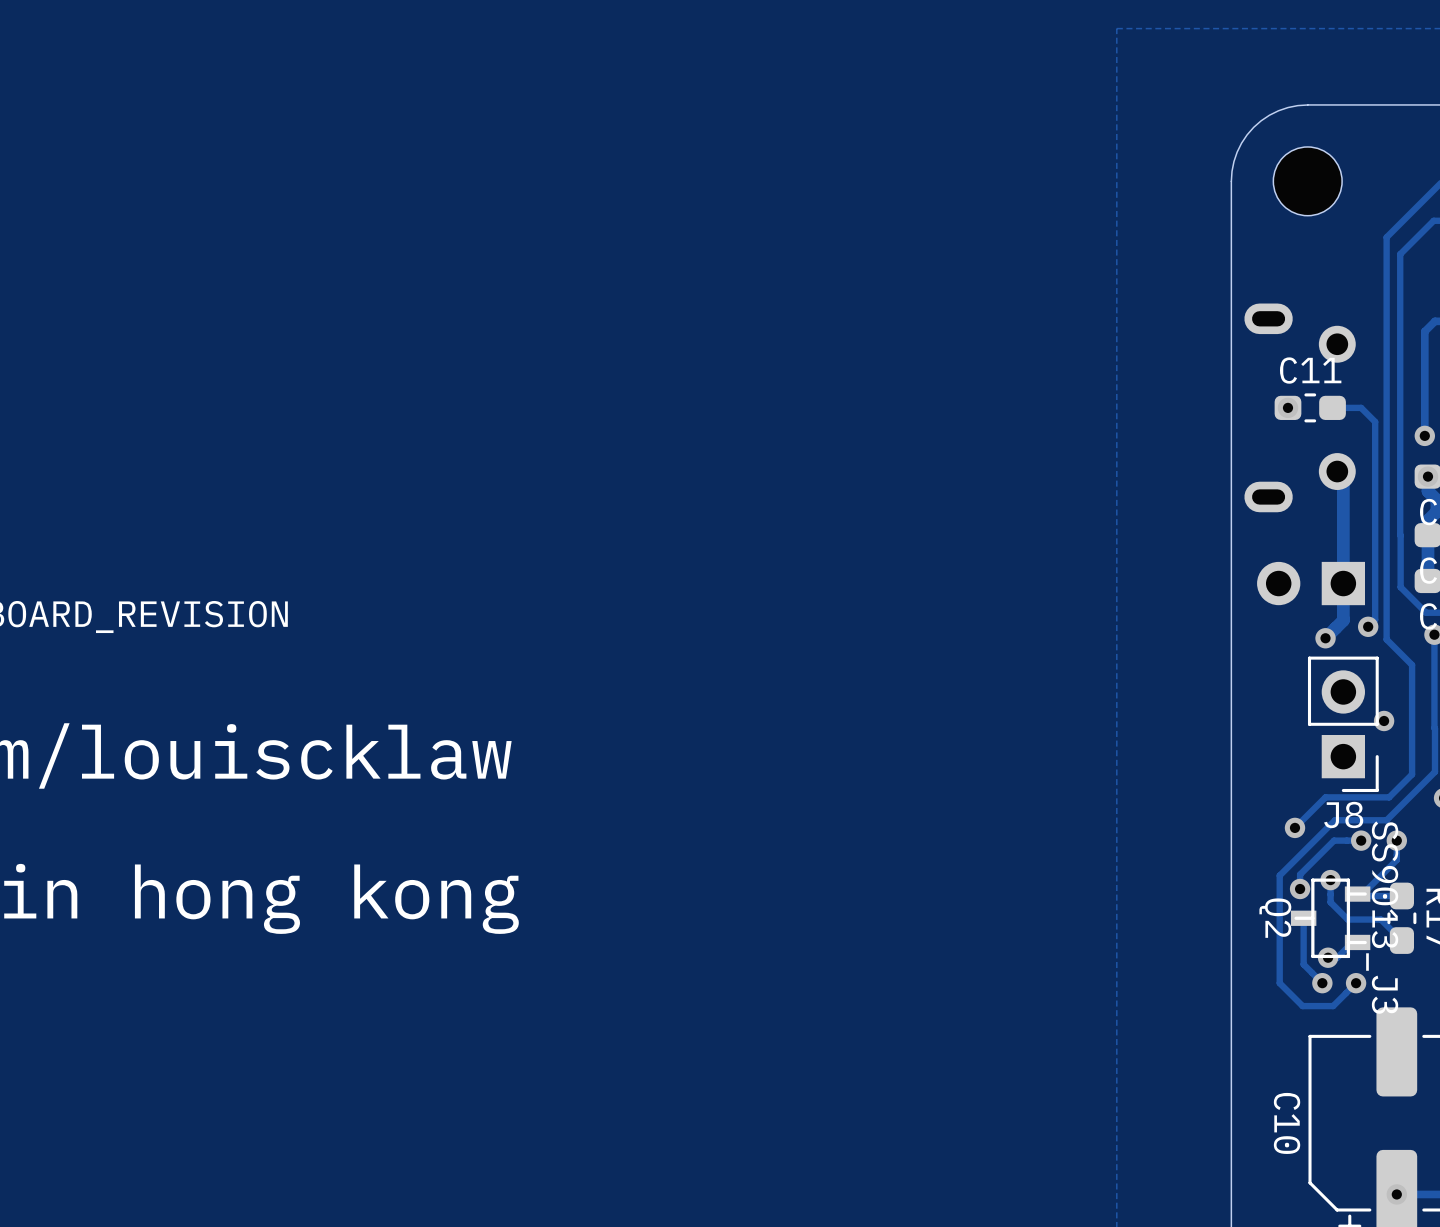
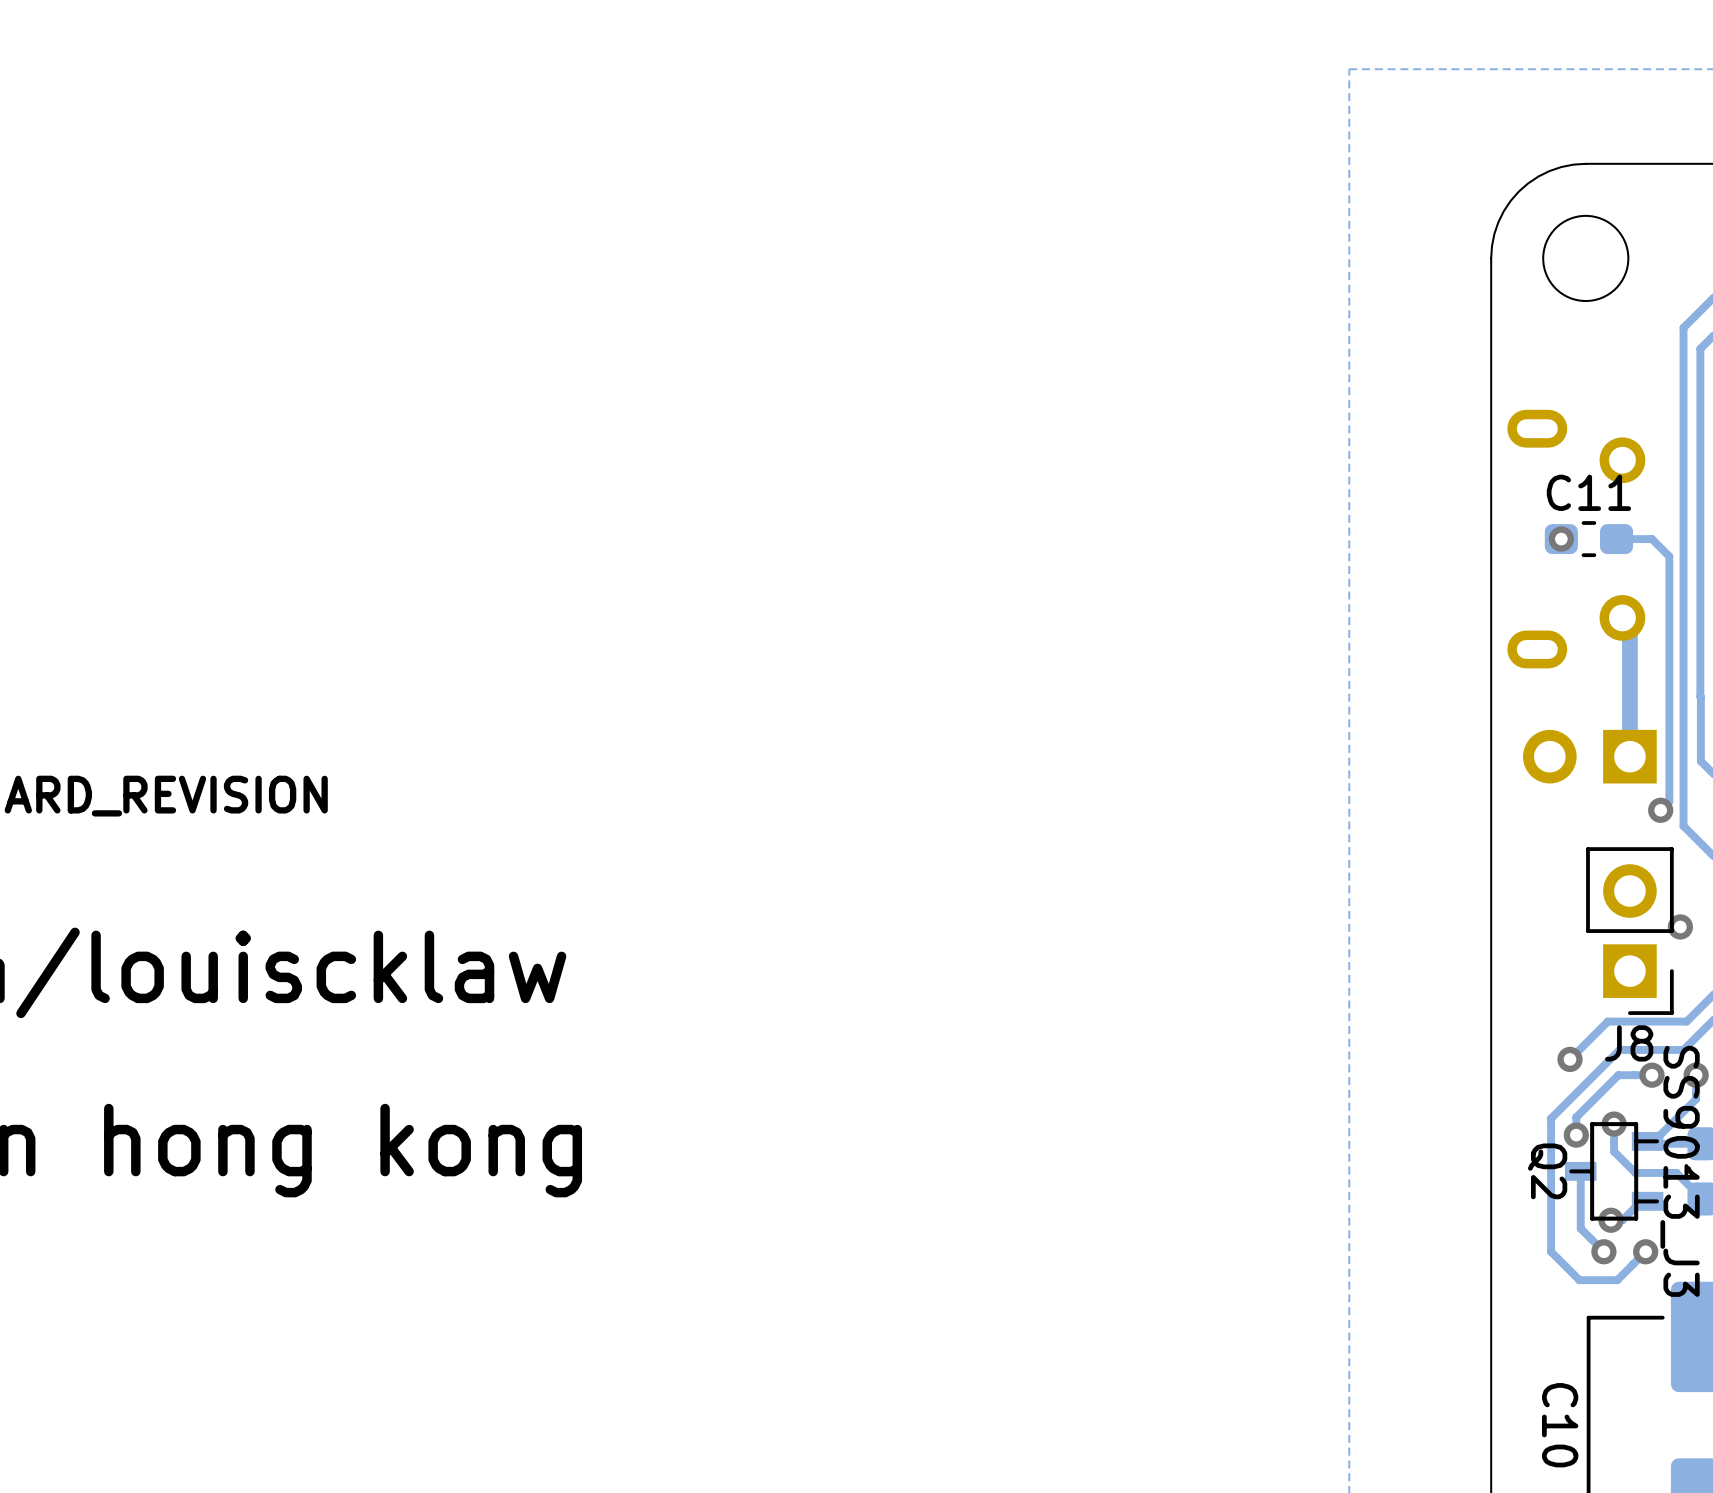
track: (1343, 583) (1343, 620) (1325, 638) -> none
via: (1325, 638) -> none

